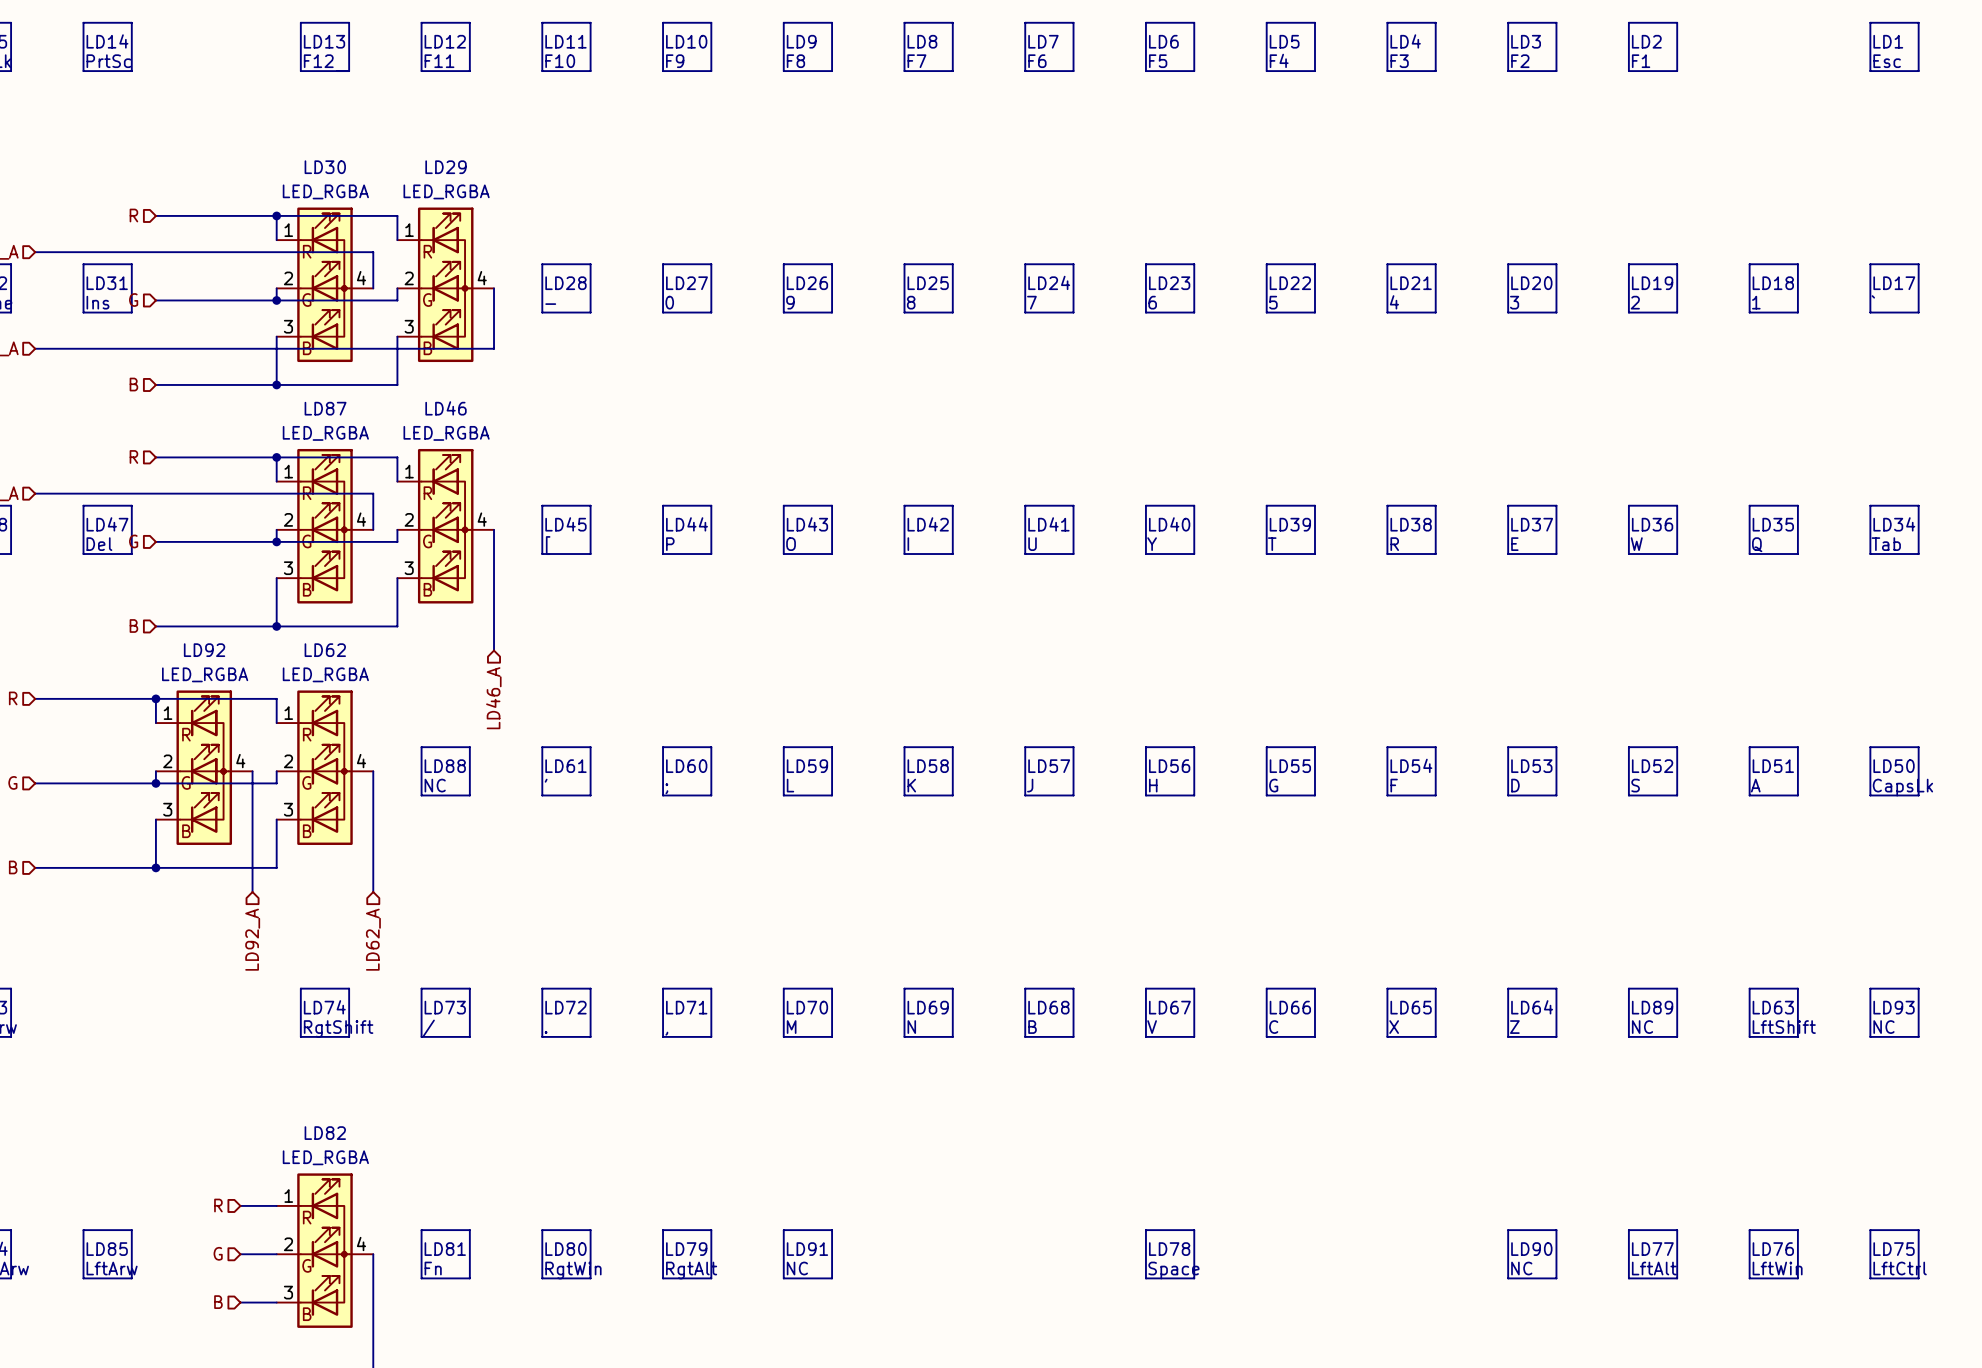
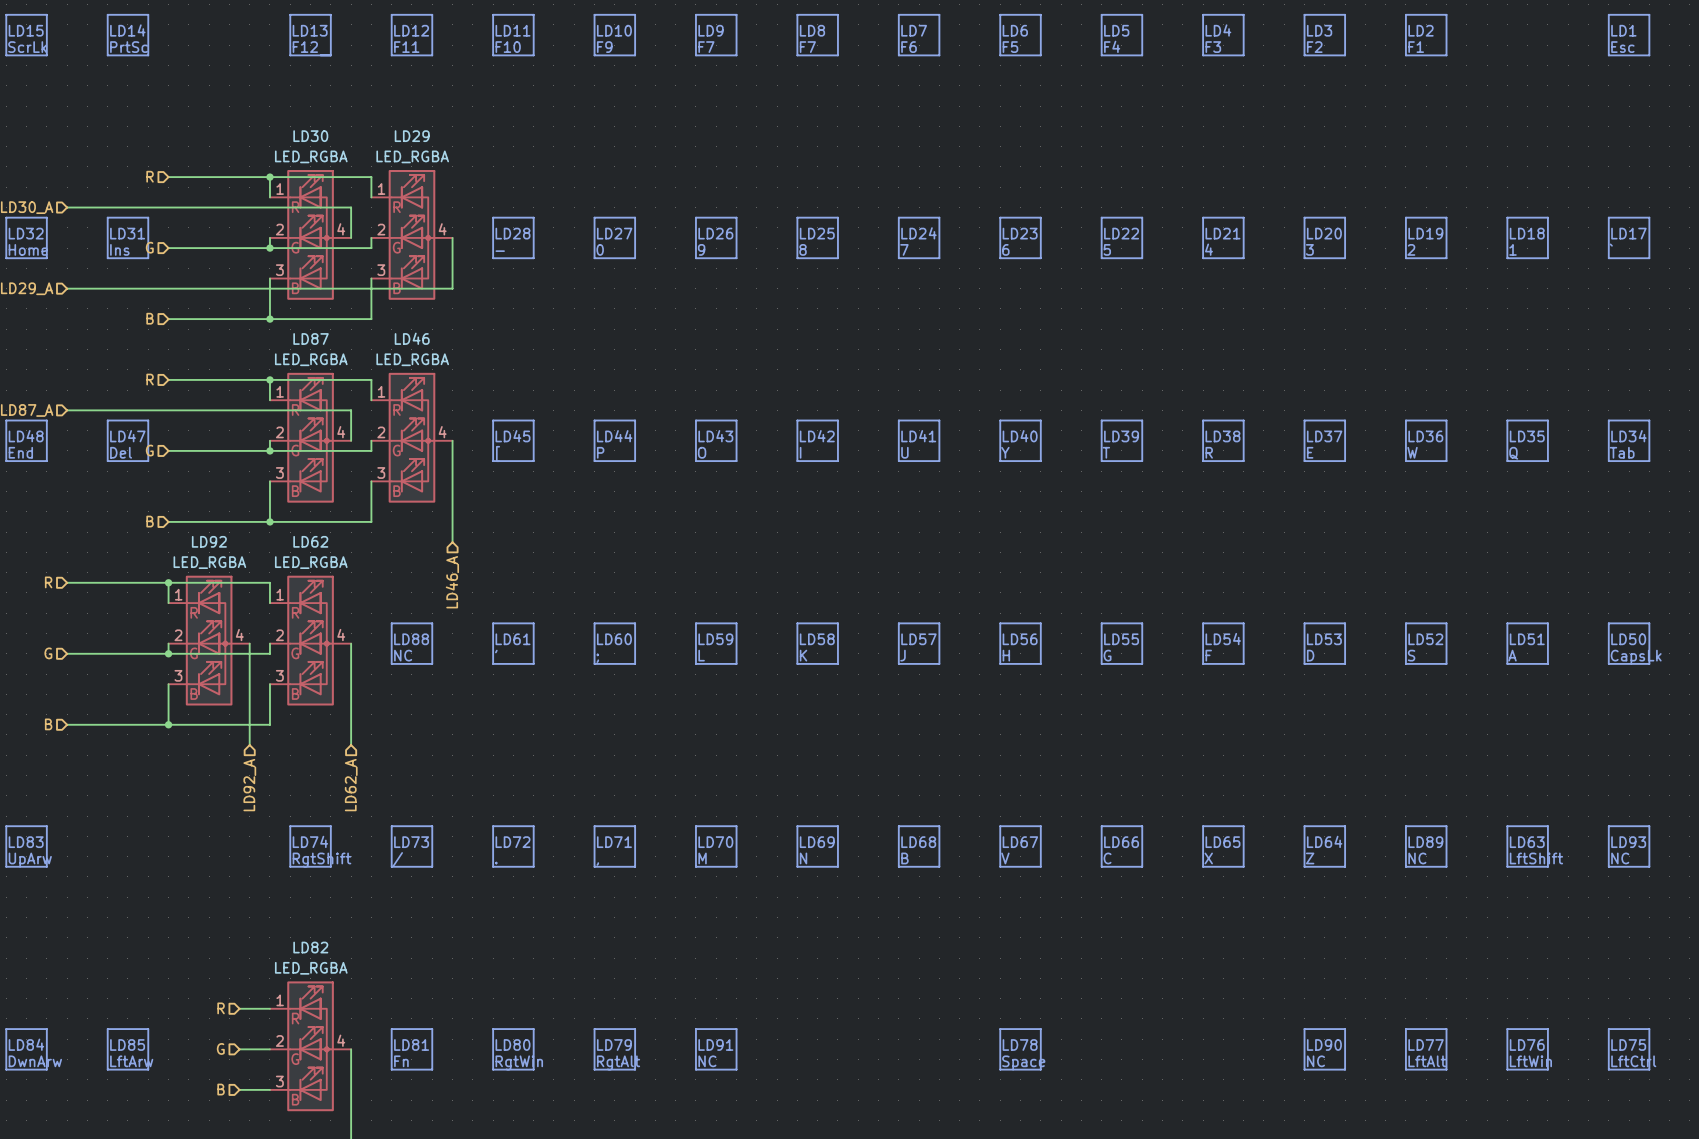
text: F8 (795, 61) -> F7 (706, 47)

